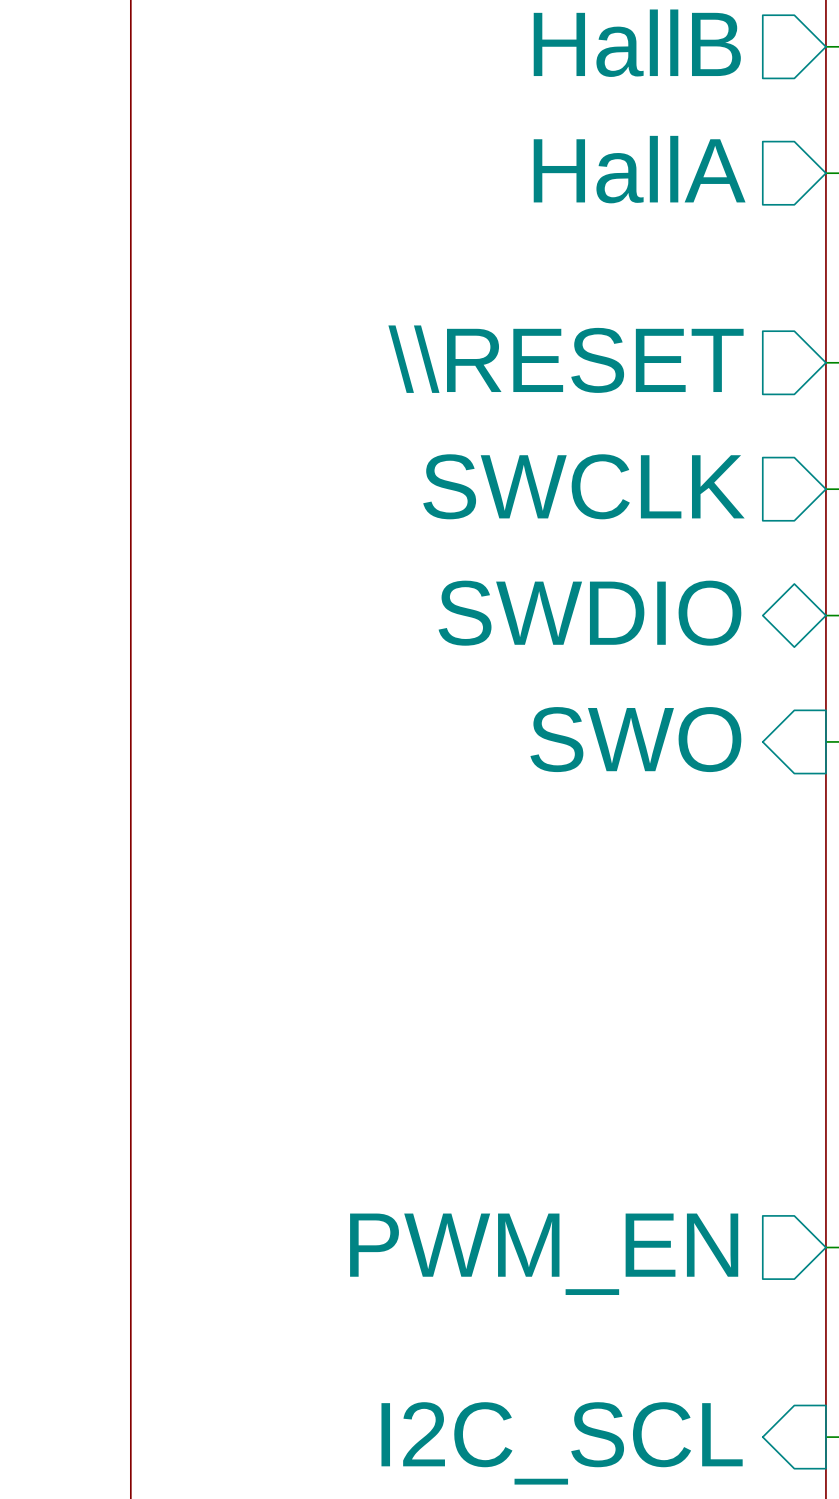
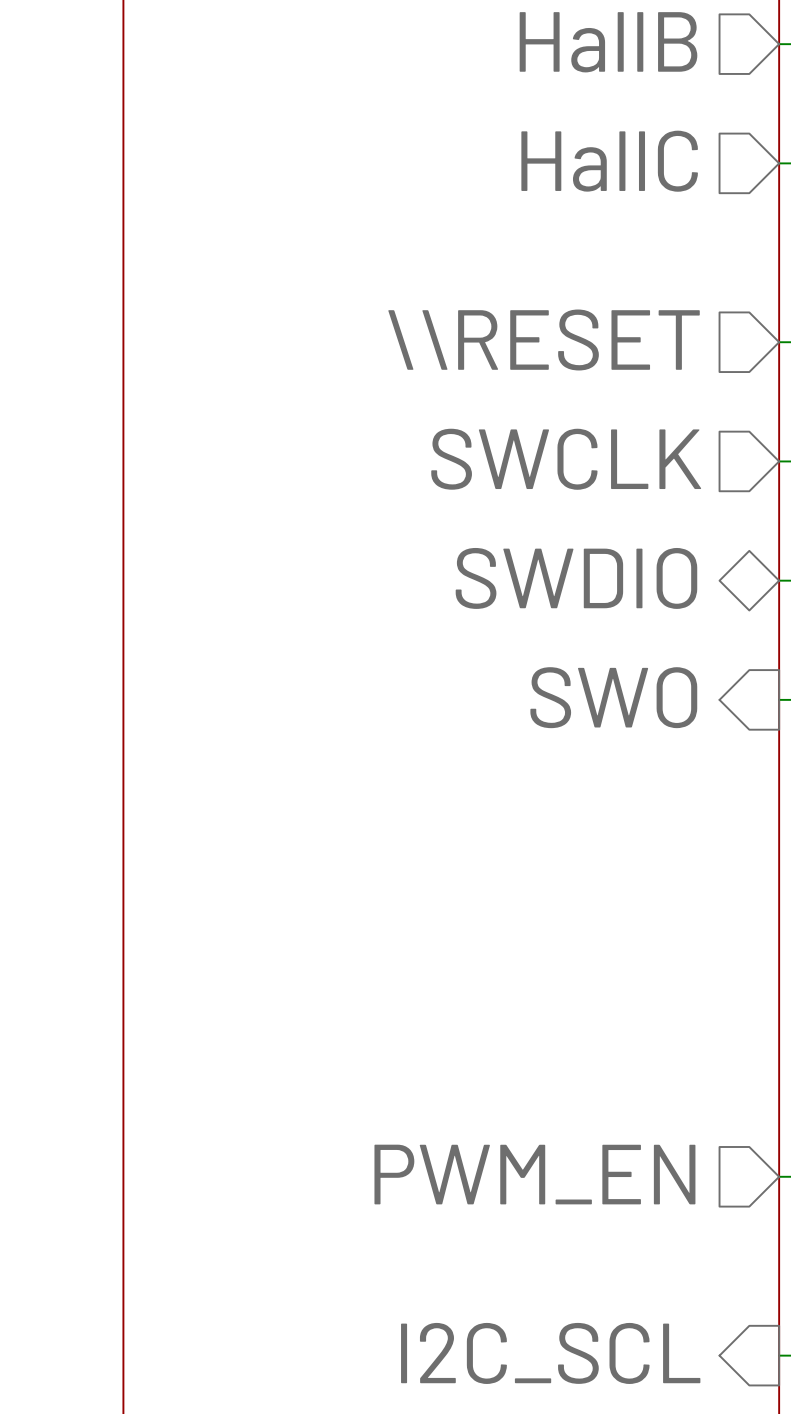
sheet pin: HallA (639, 169) -> HallC (609, 161)

